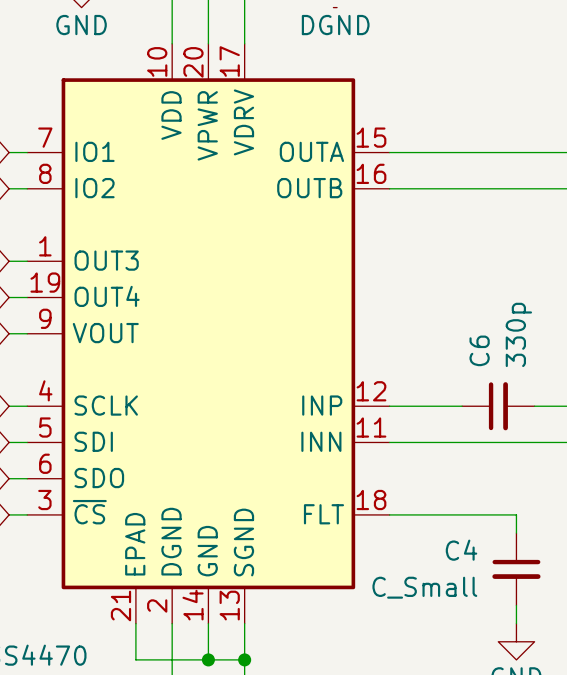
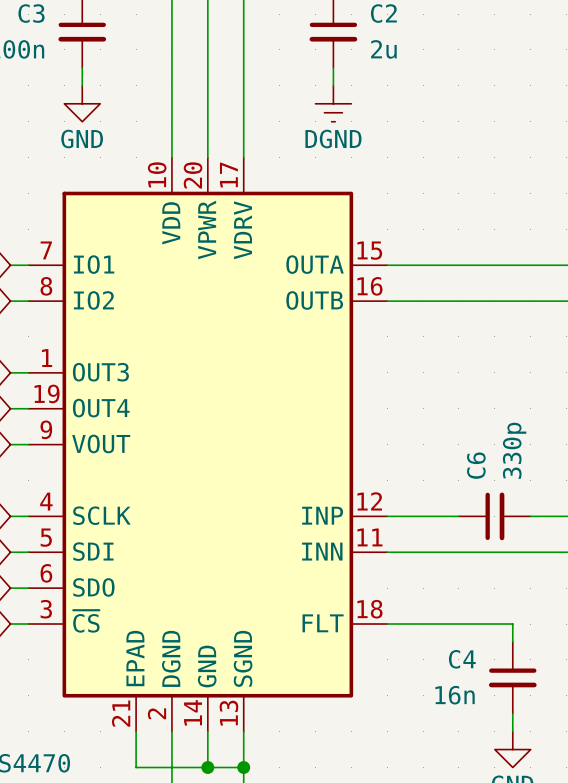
C4 value: C_Small (424, 587) -> 16n (455, 695)

